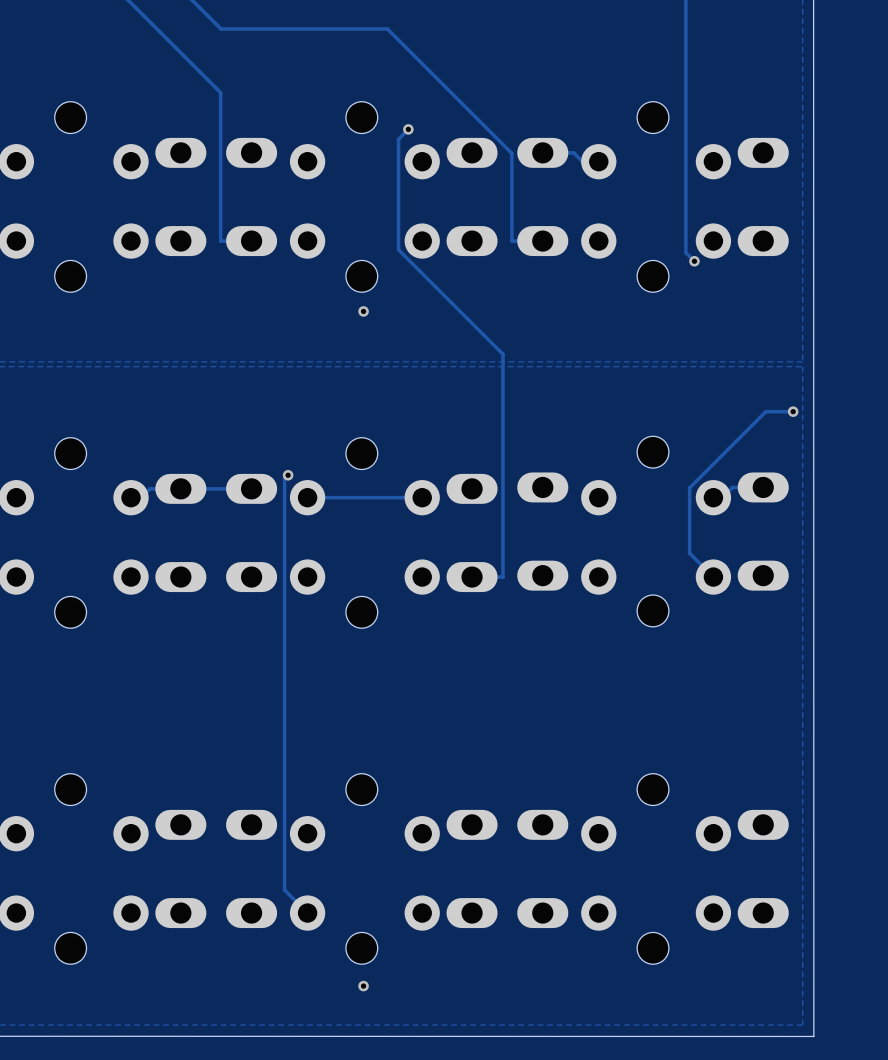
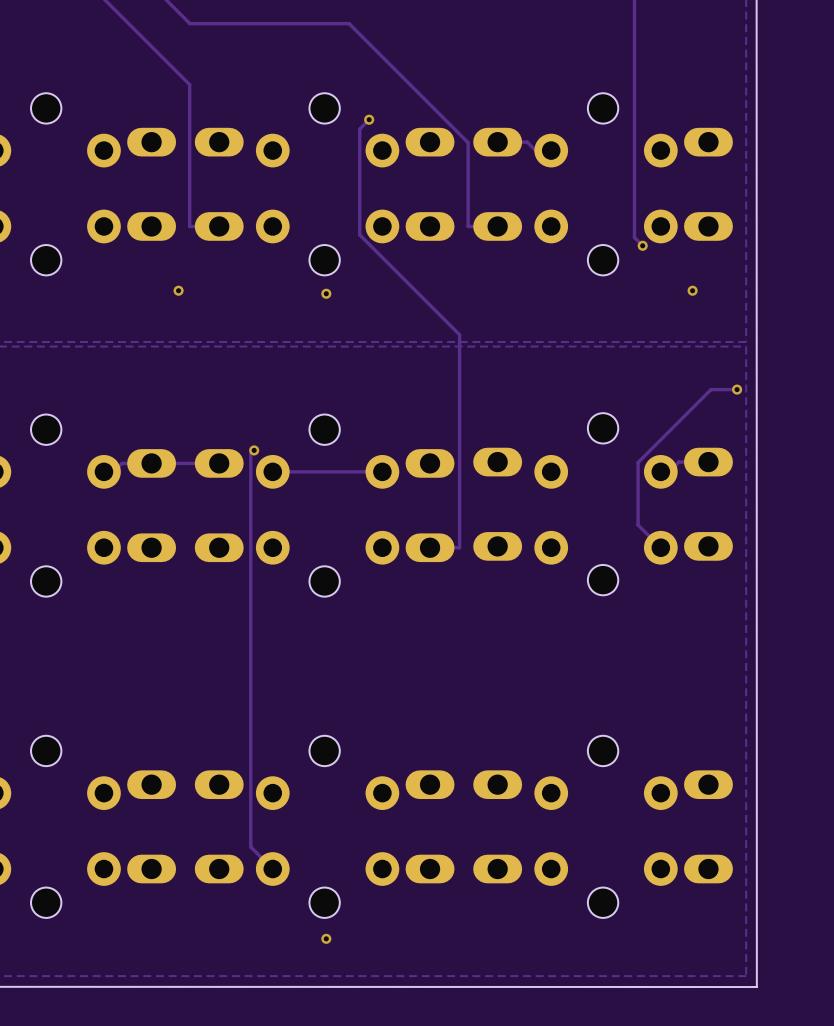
via: none -> (178, 290)
via: none -> (692, 290)

